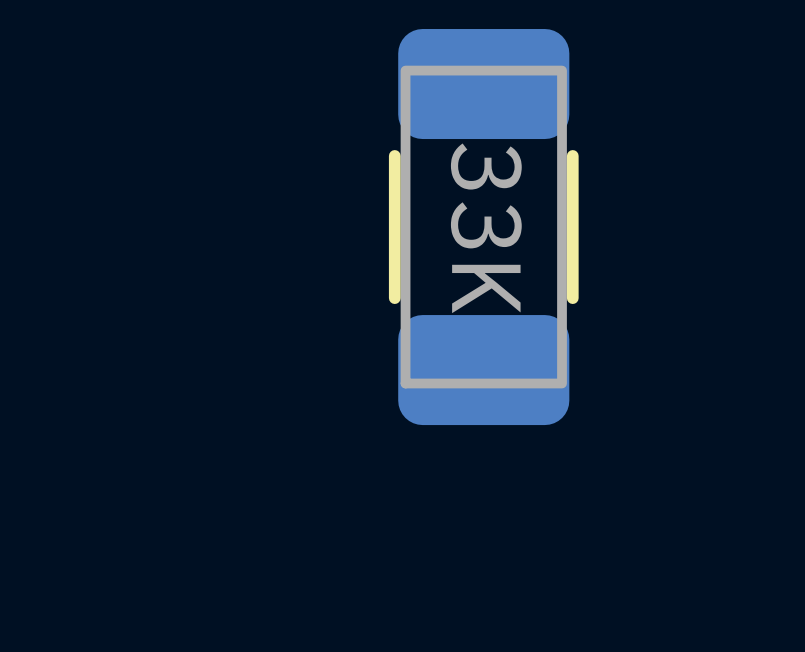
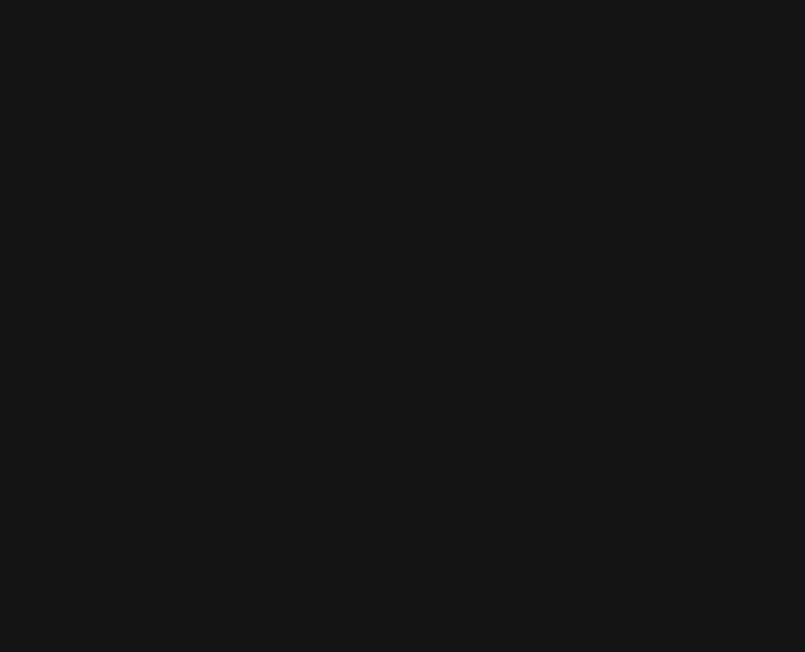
part: 33K (483, 227) -> none

